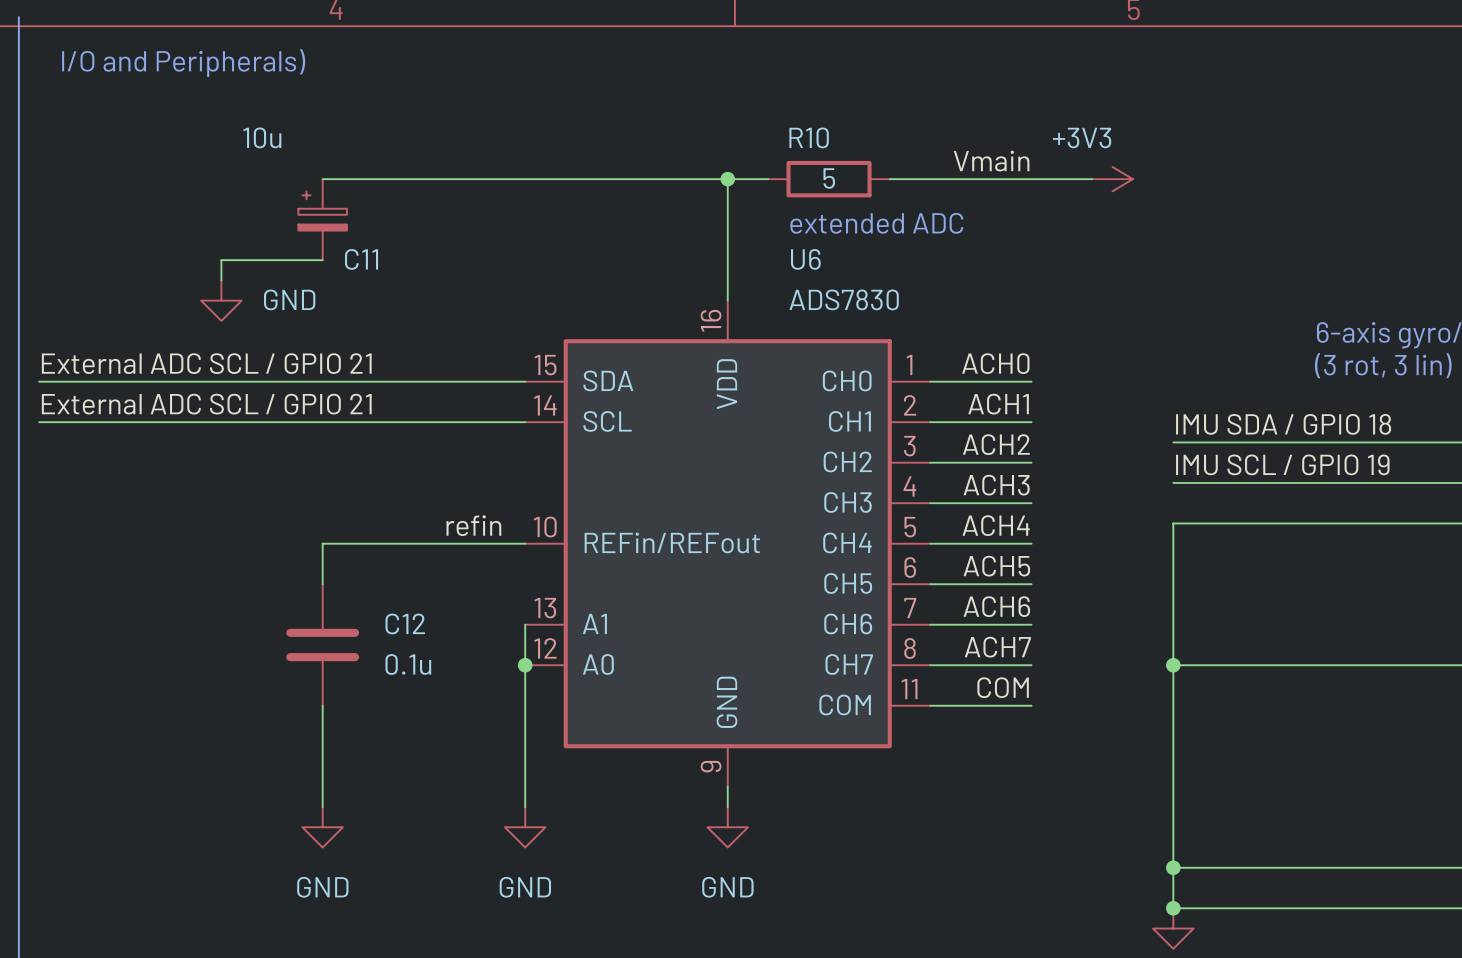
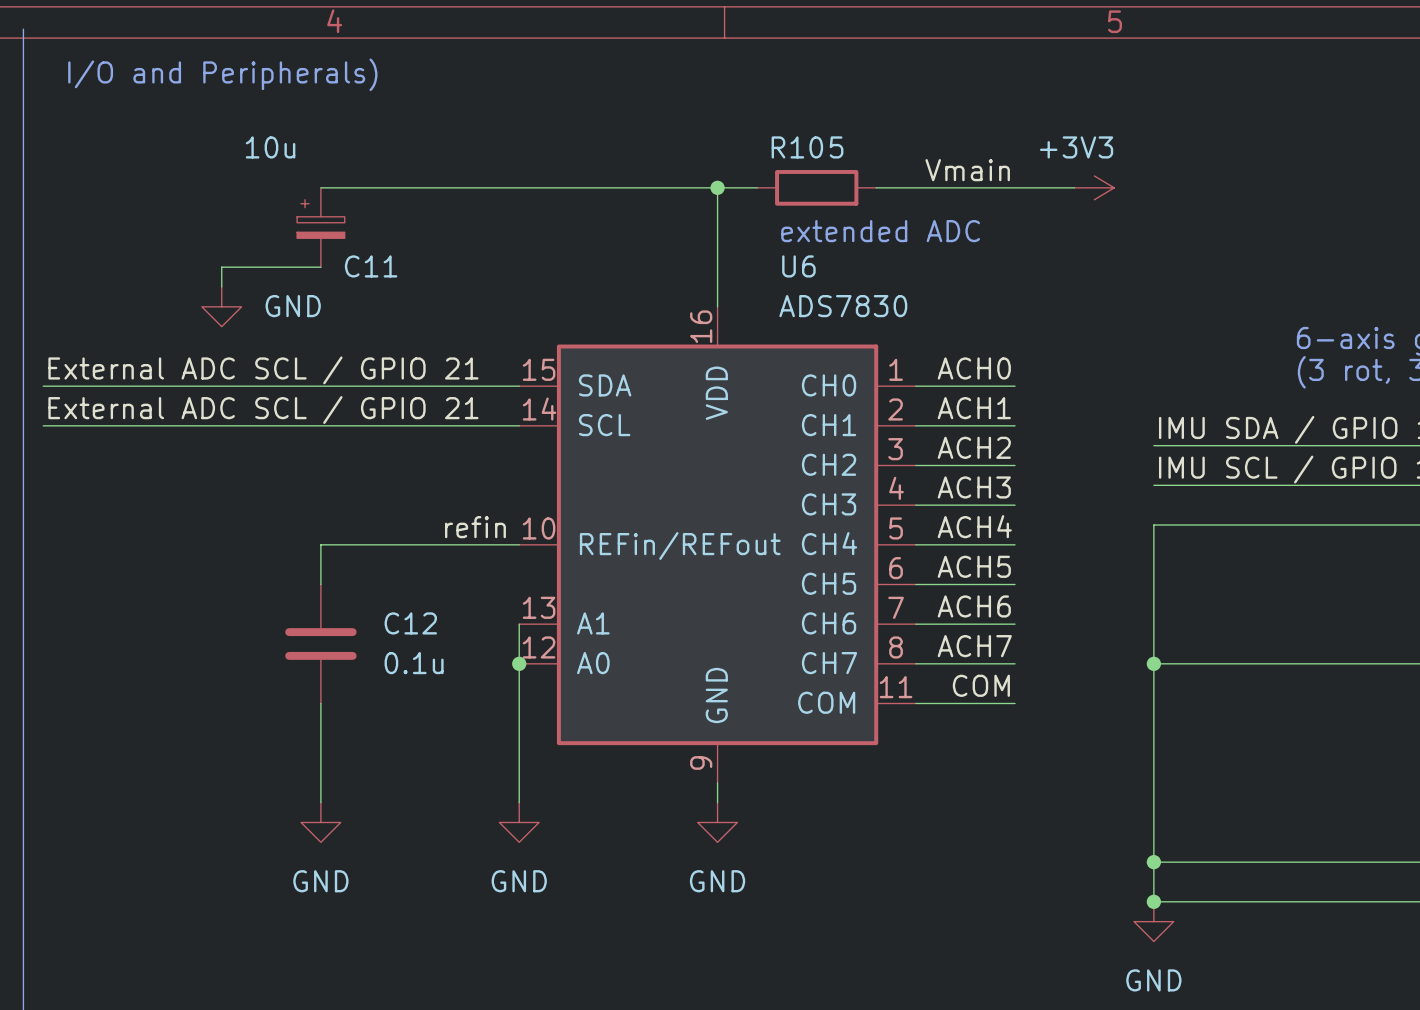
R10 value position: 5 (829, 178) -> 5 (836, 147)

